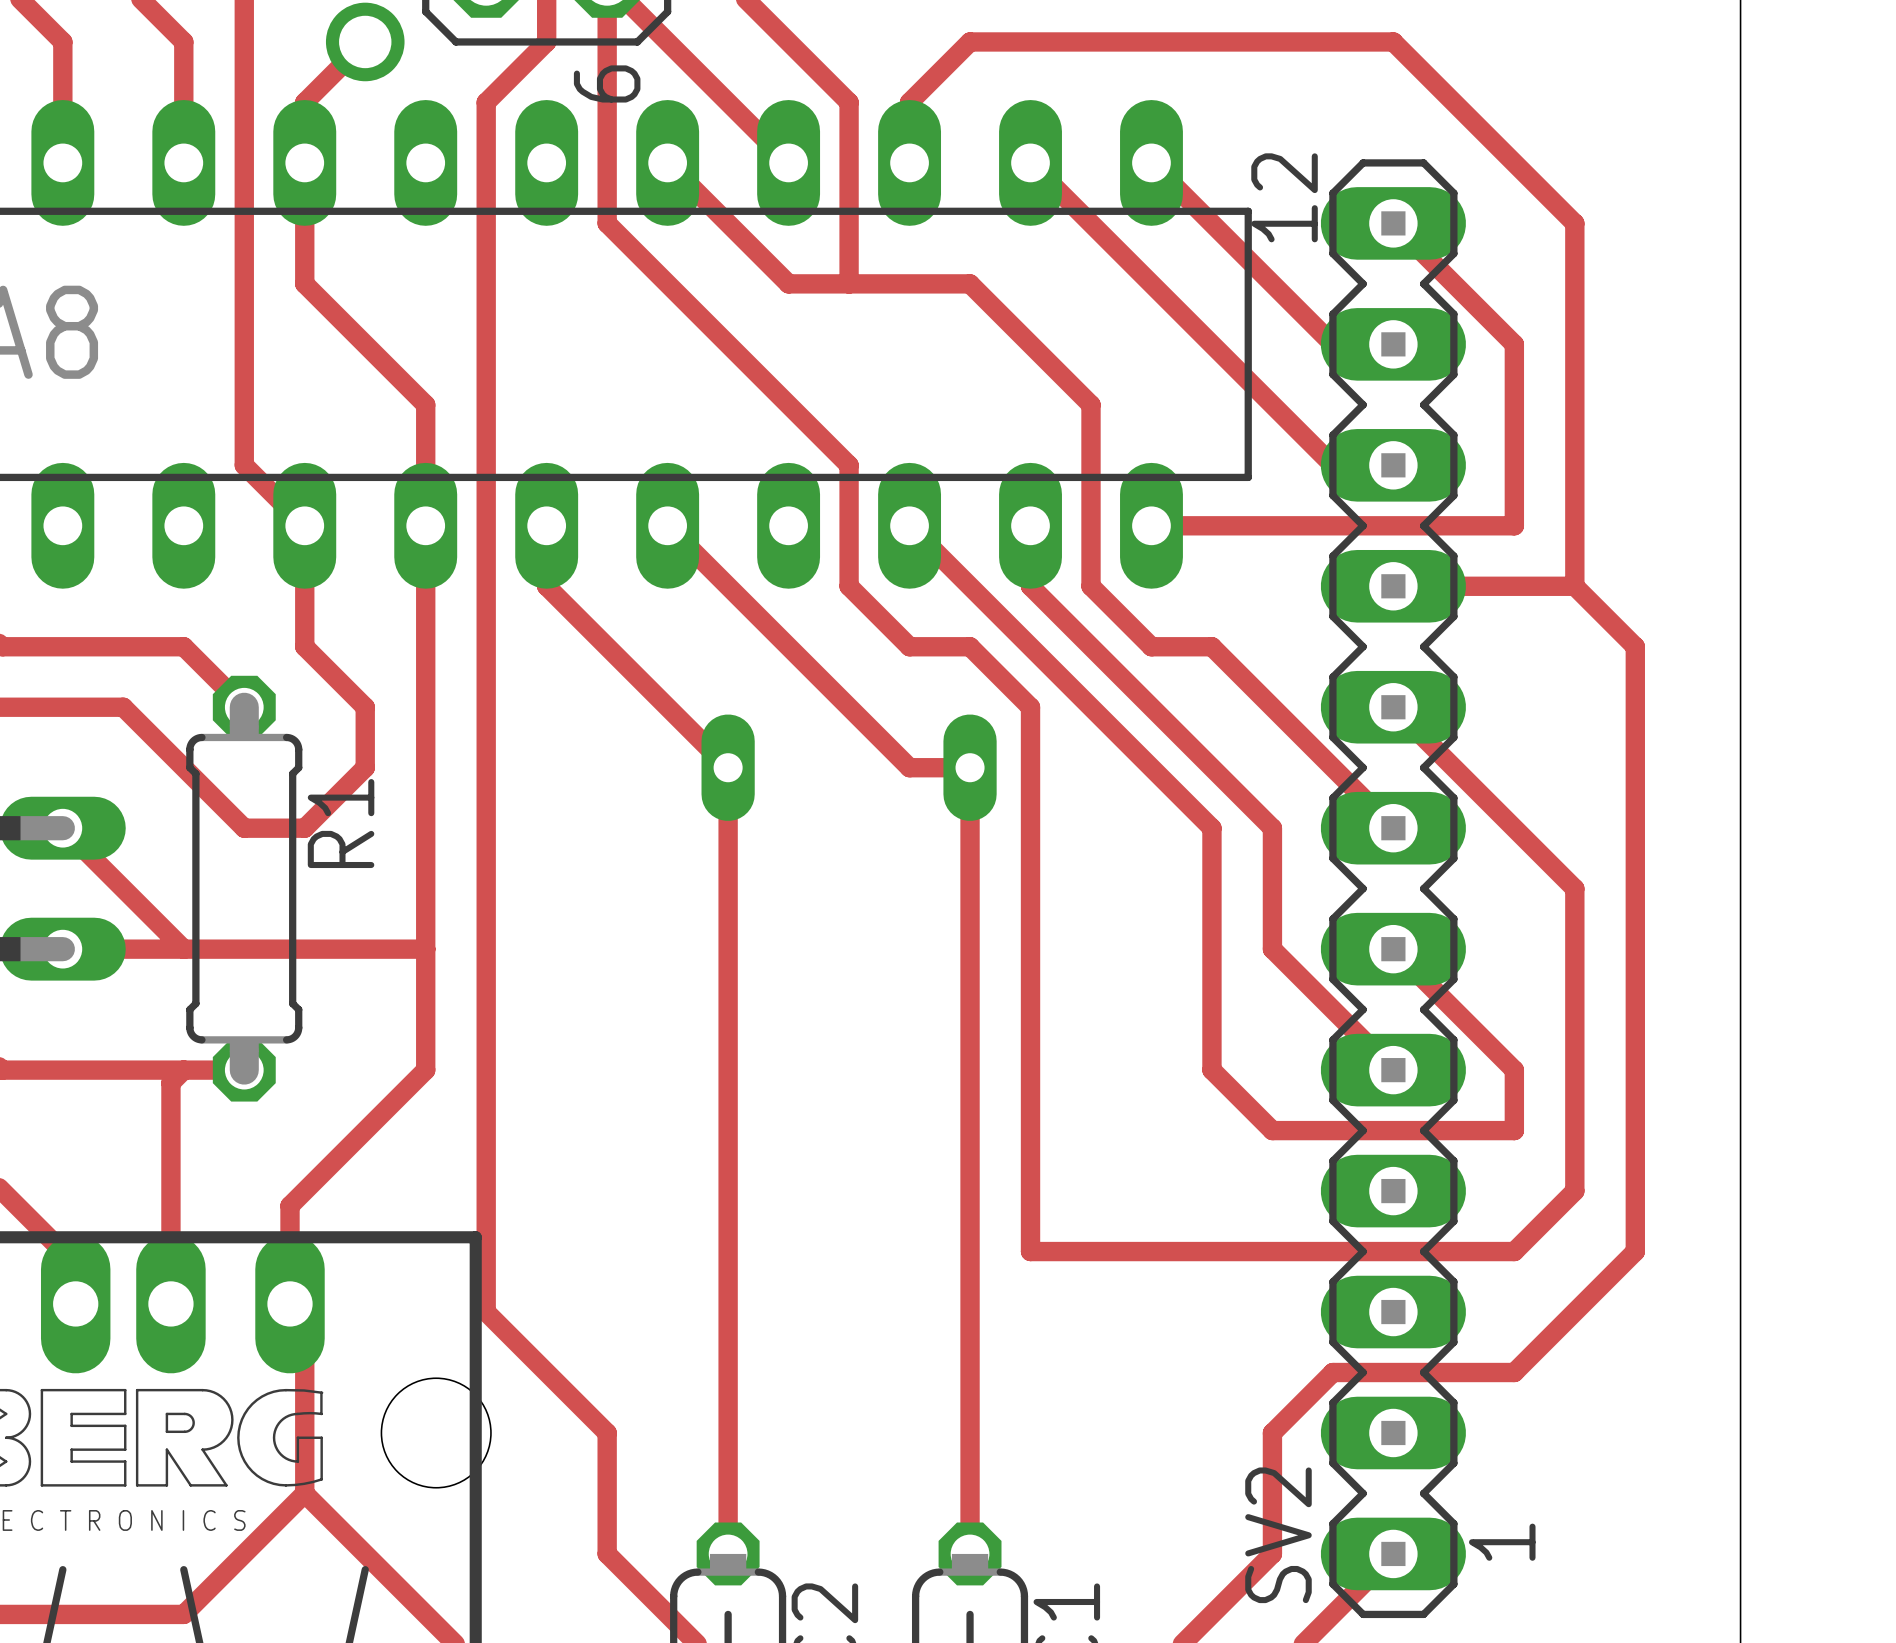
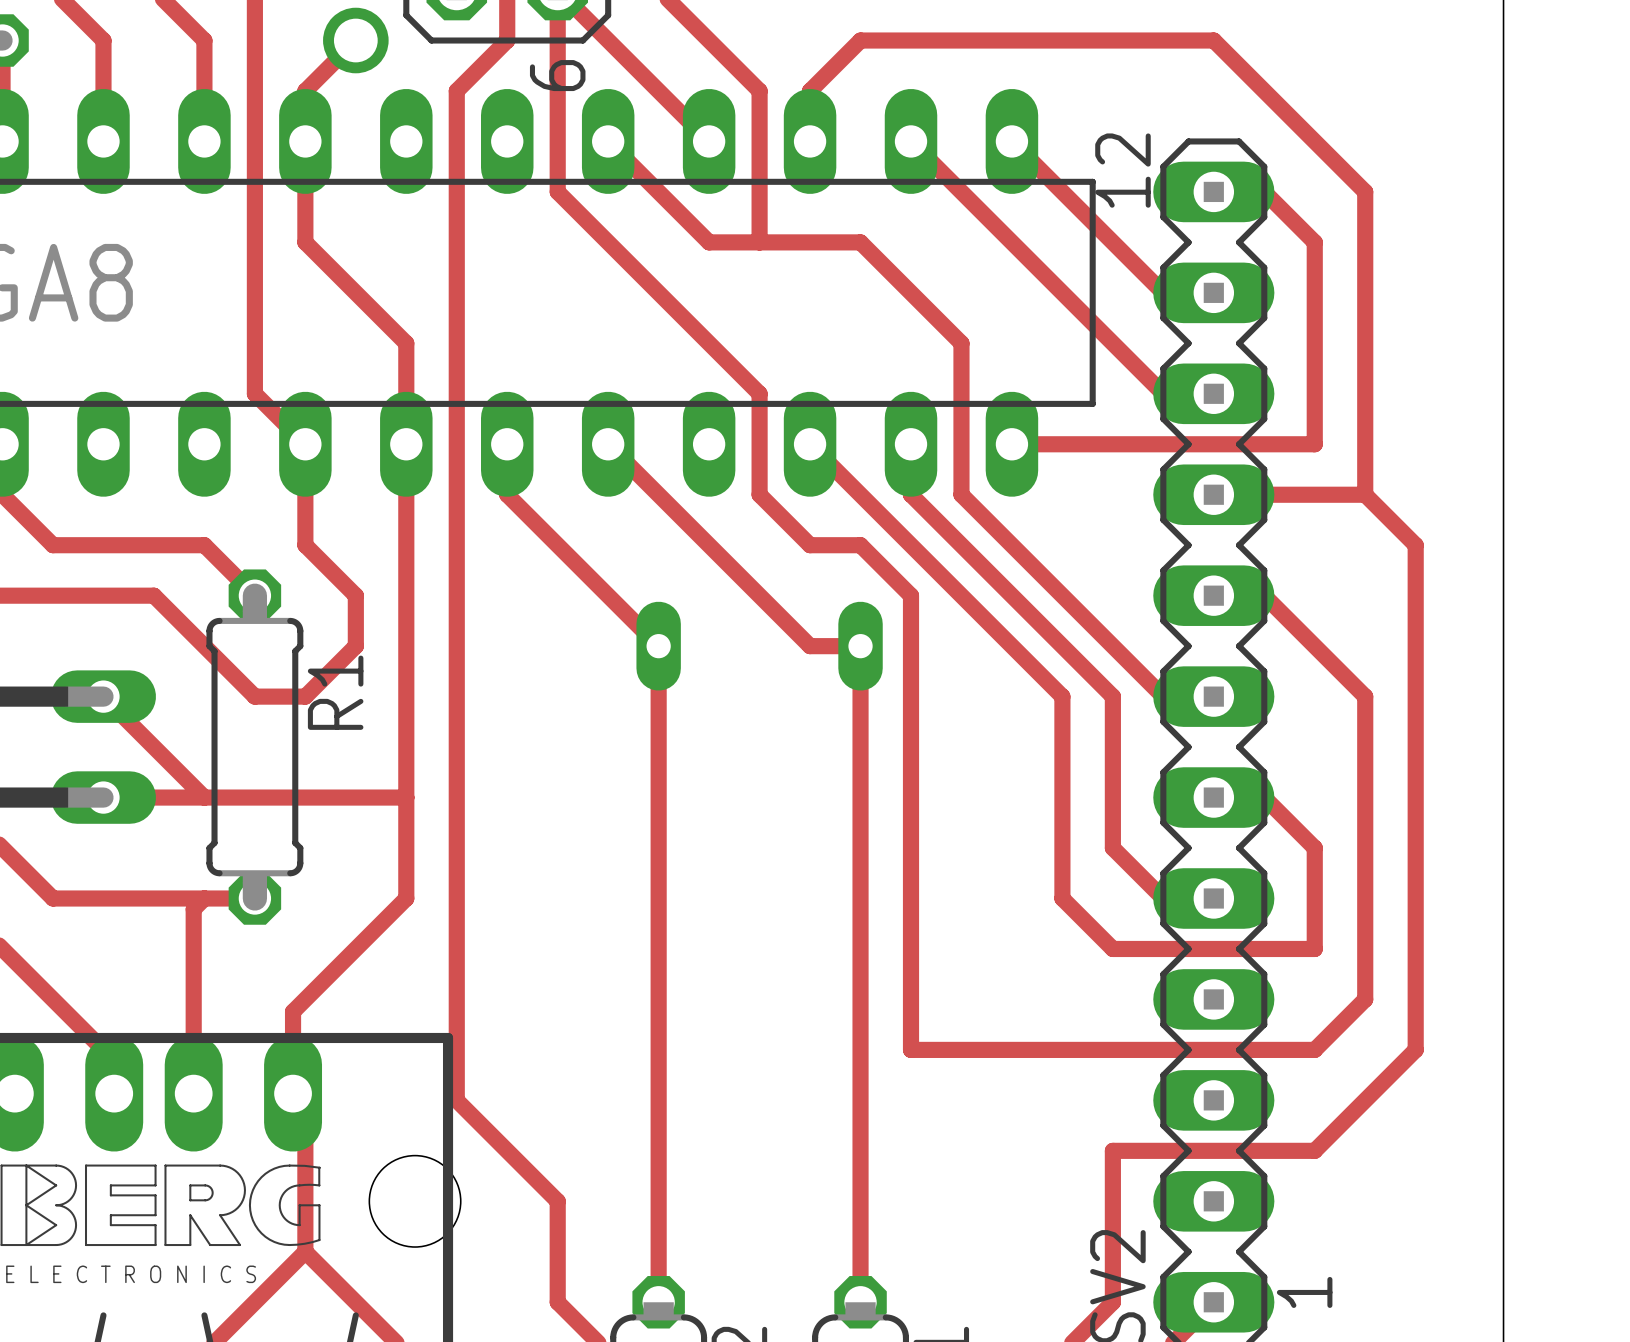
track: (1393, 223) (1514, 344) -> (1213, 191) (1264, 191) (1314, 242) (1314, 292)
track: (1151, 646) (1211, 646) (1393, 828) -> (1011, 545) (1163, 696) (1213, 696)
track: (1393, 707) (1574, 888) -> (1213, 595) (1264, 595) (1365, 696) (1365, 747)
track: (1272, 949) (1393, 1070) -> (1112, 797) (1112, 848) (1163, 898) (1213, 898)
track: (1393, 949) (1514, 1070) -> (1213, 797) (1264, 797) (1314, 848) (1314, 898)
track: (1332, 1372) (1272, 1432) -> (1163, 1150) (1112, 1150) (1112, 1201)

